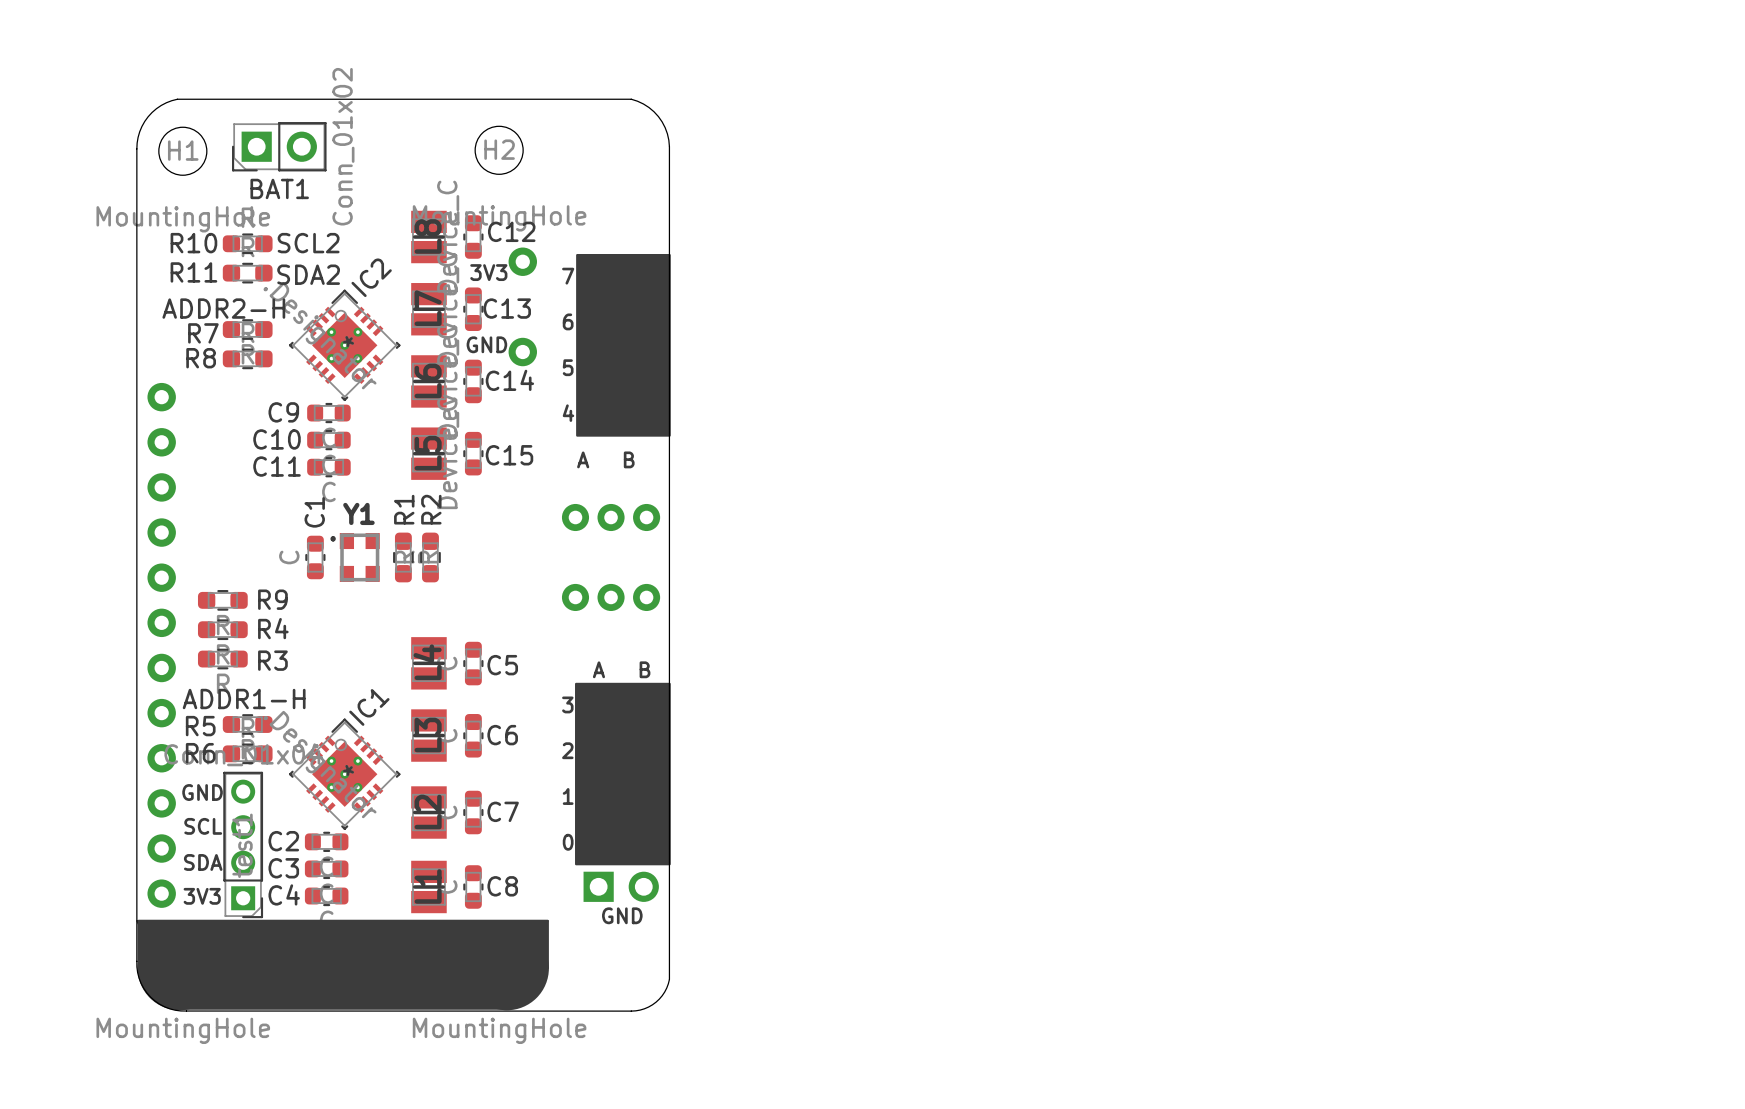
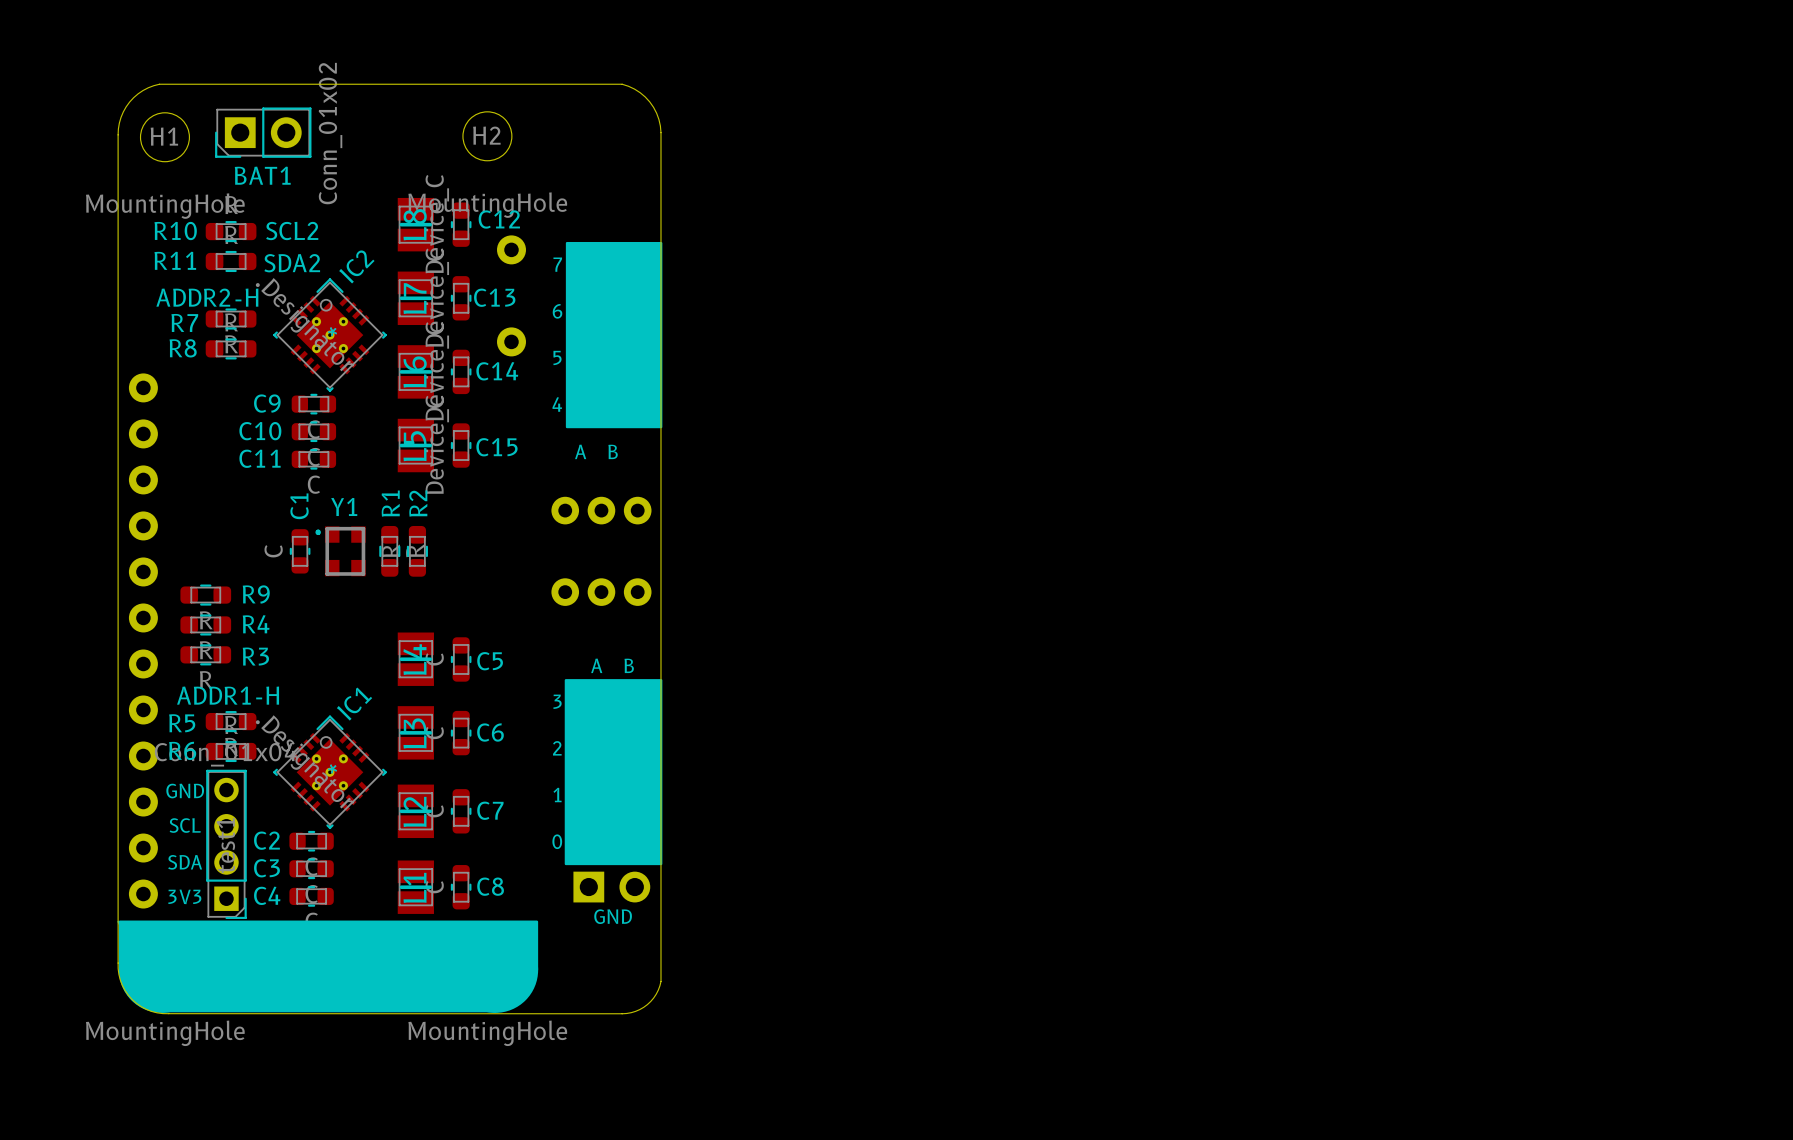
text: 3V3 (488, 272) -> none
text: GND (486, 344) -> none

